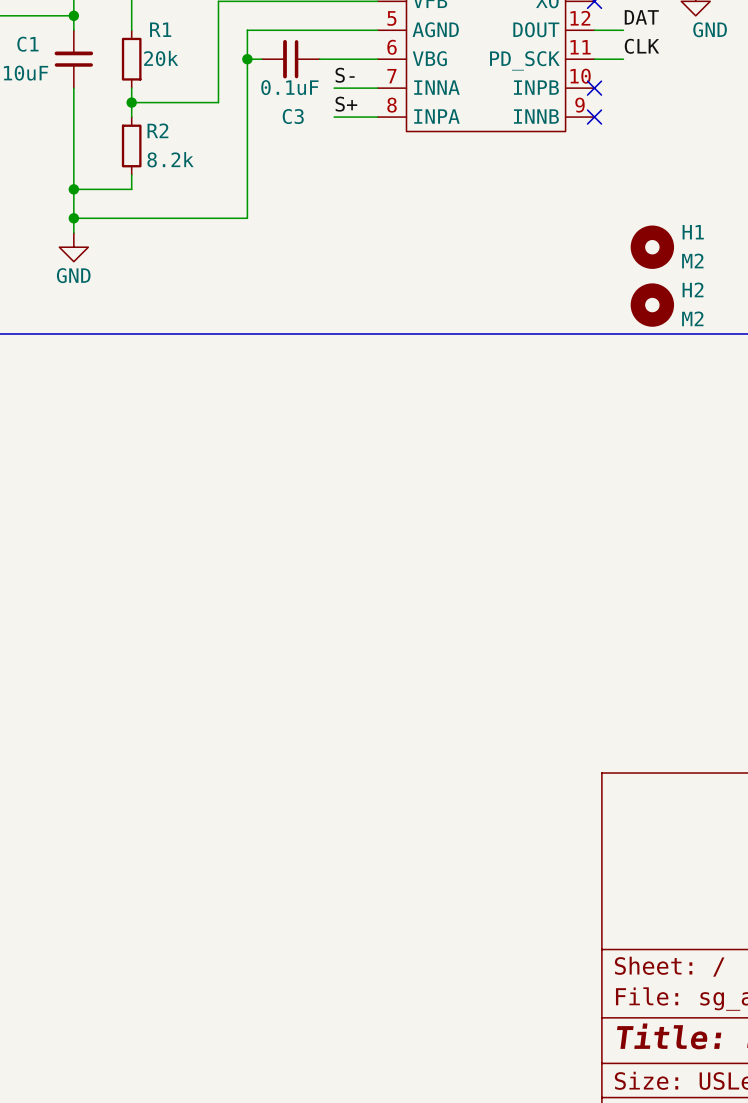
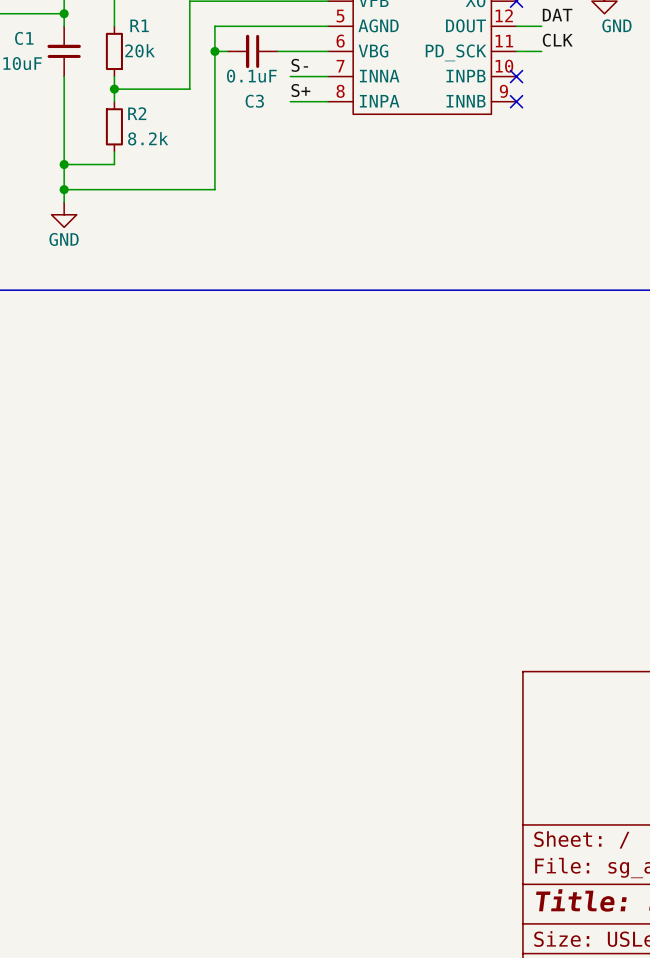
H1: M2 (652, 247) -> none
H2: M2 (652, 305) -> none

